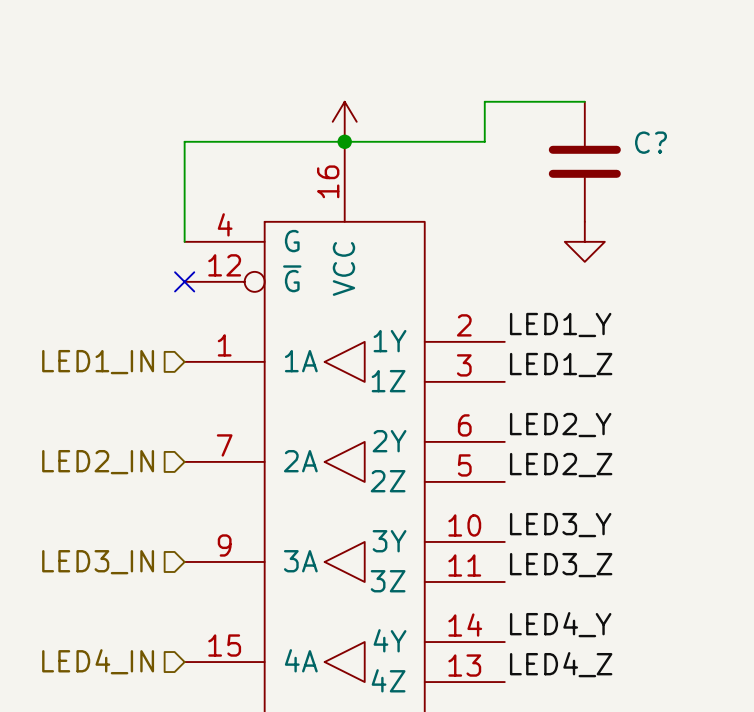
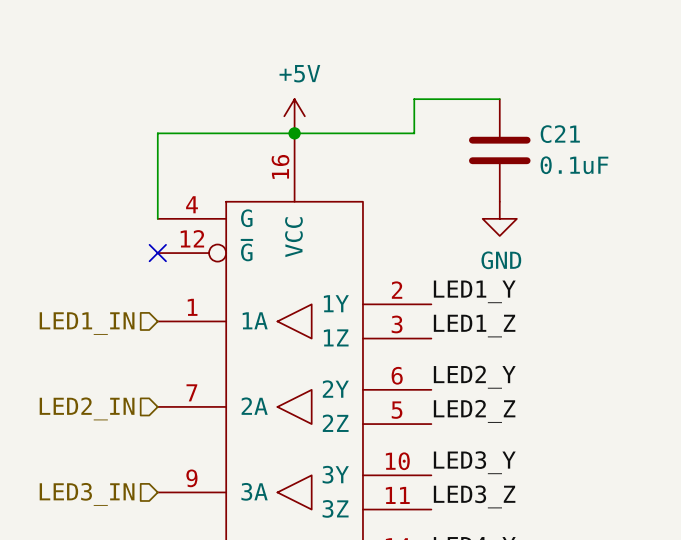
power symbol text: none -> +5V (299, 73)
C? name: C? (651, 142) -> C21 (560, 134)
C? value: none -> 0.1uF (574, 165)
power symbol text: none -> GND (501, 260)

